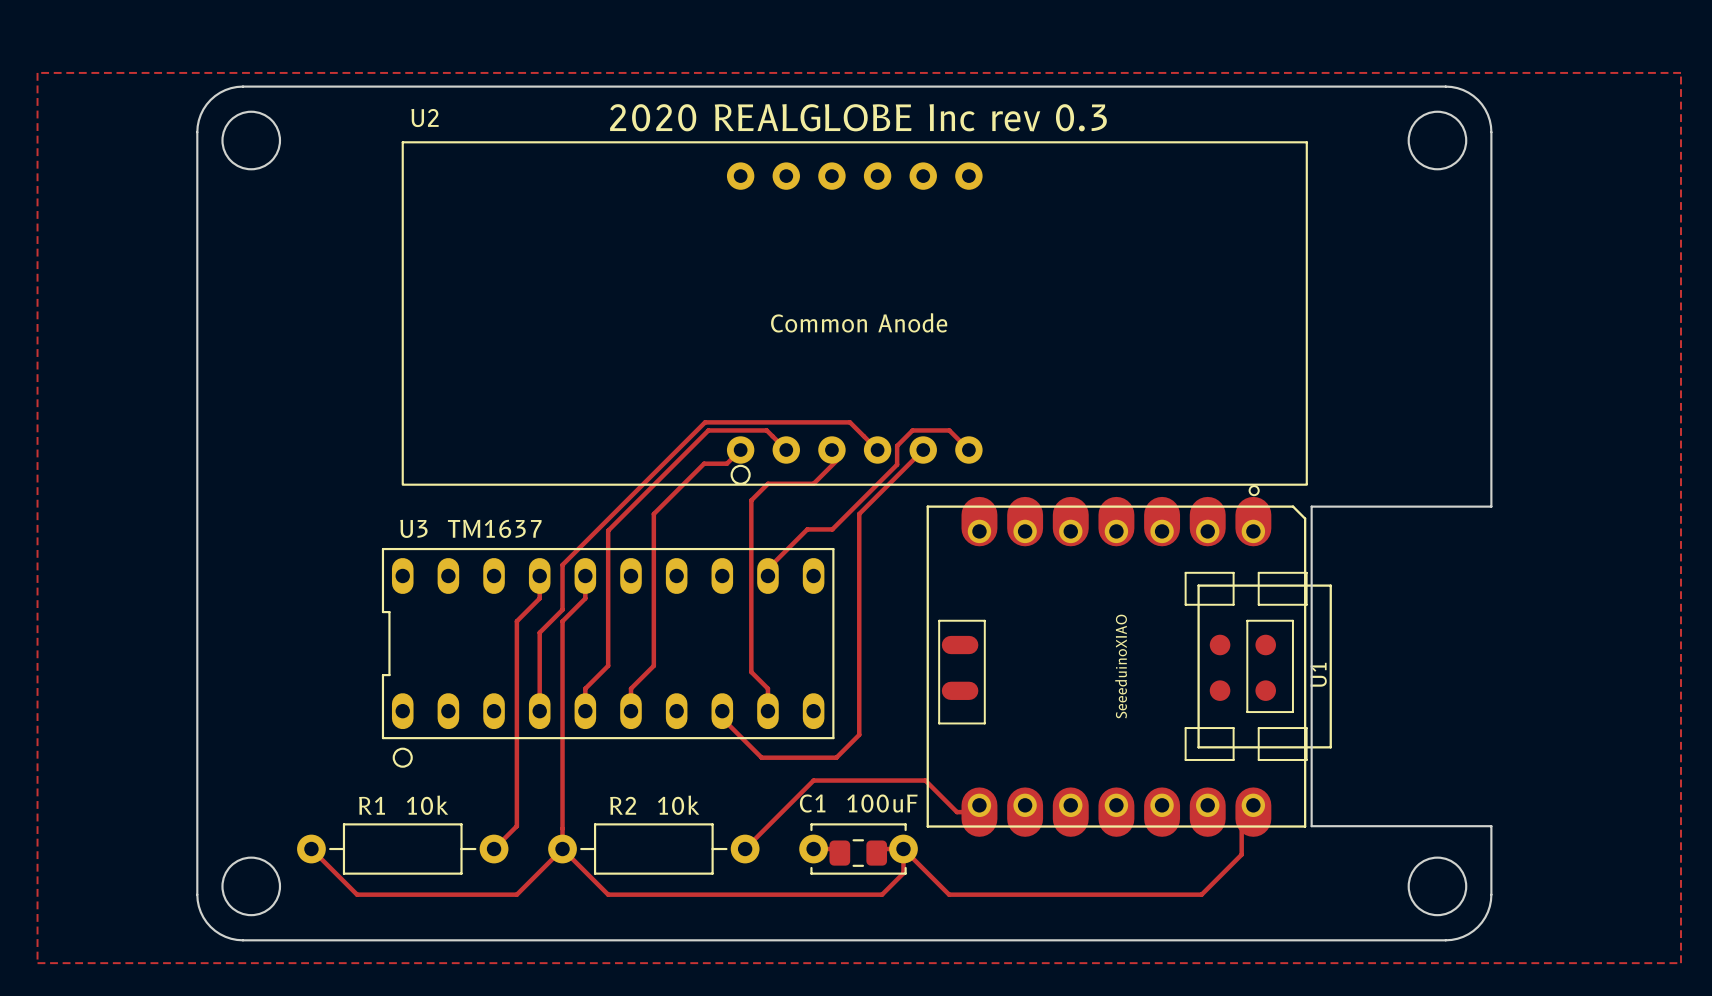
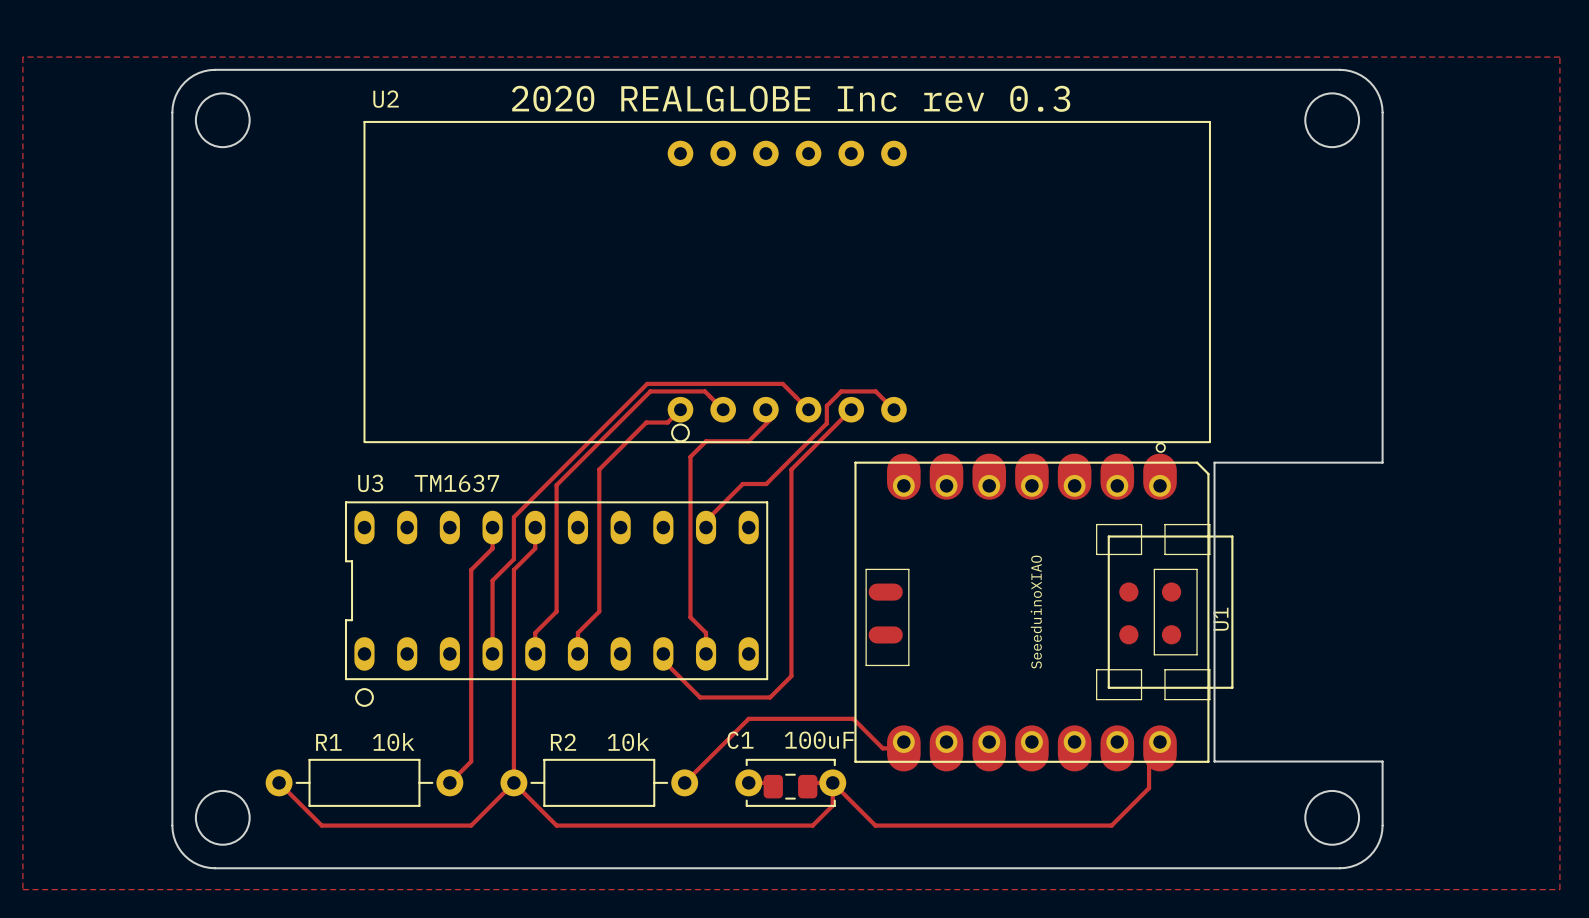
text: Common Anode (859, 322) -> none

